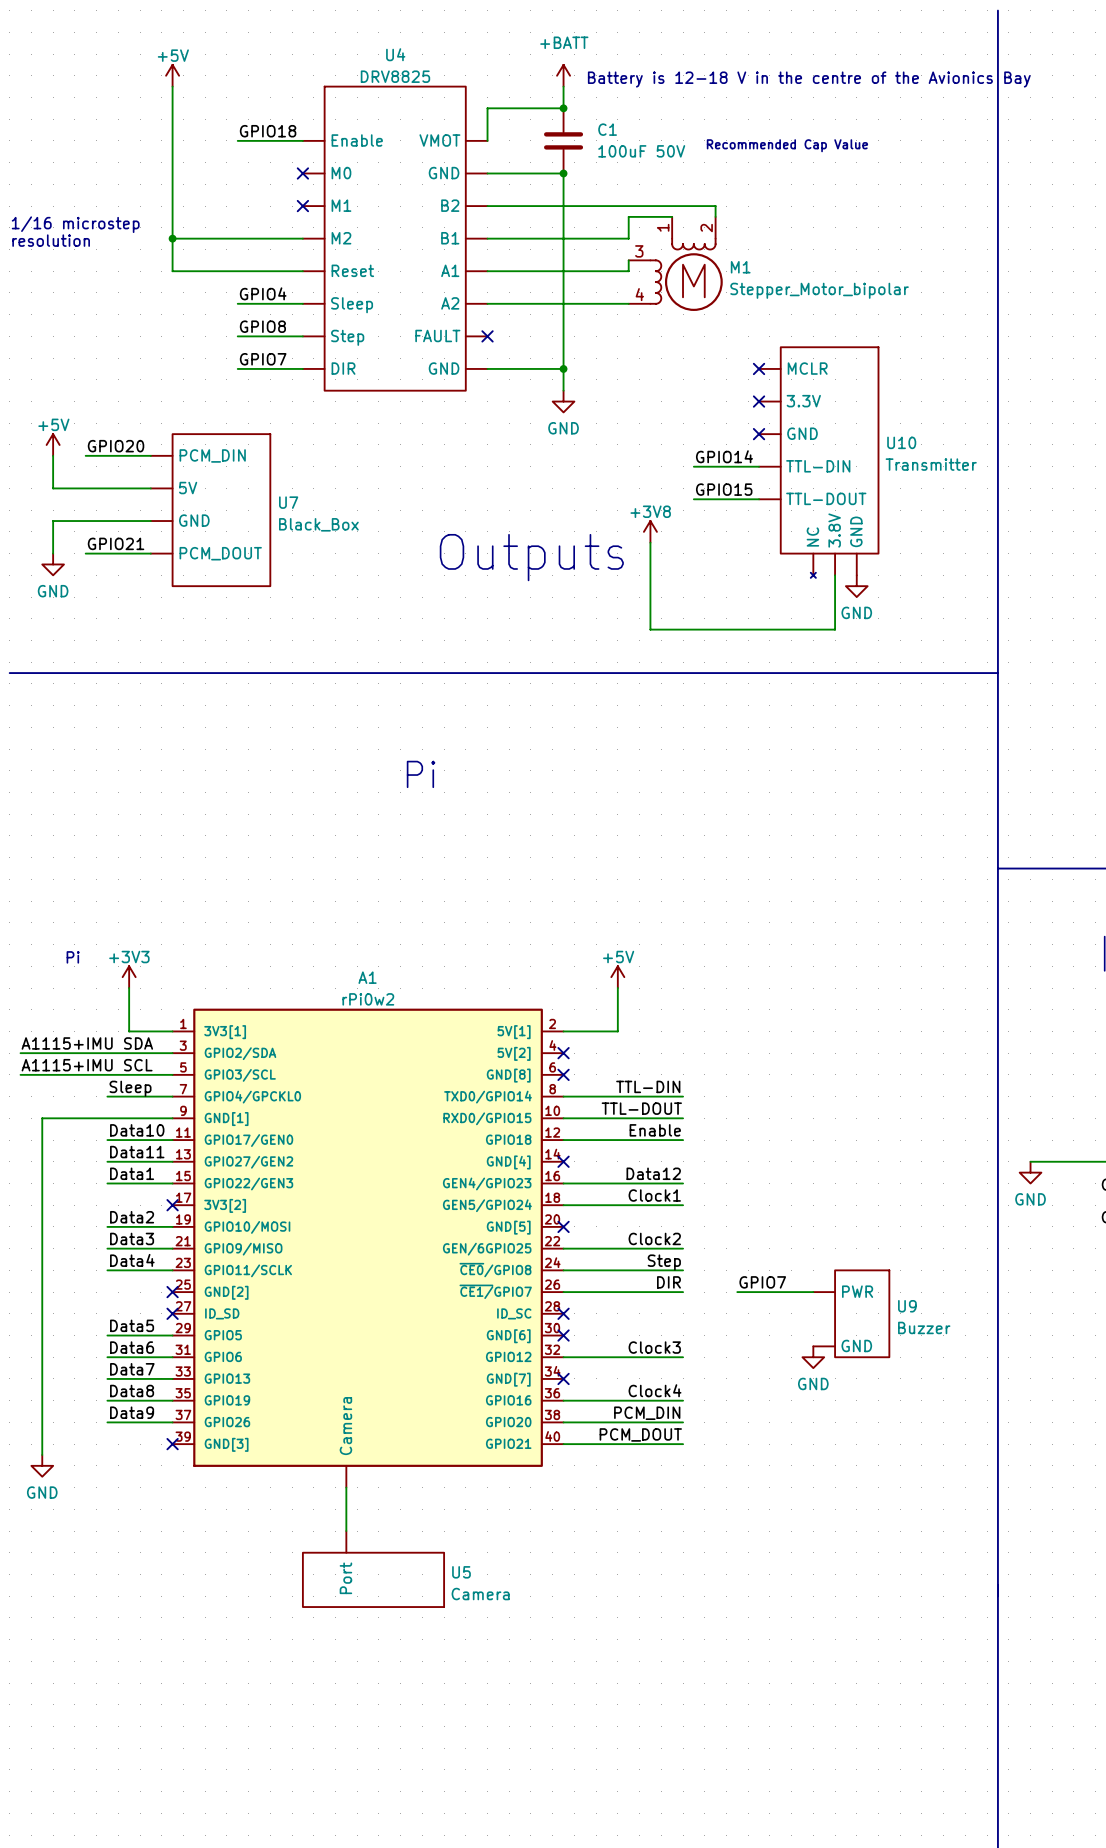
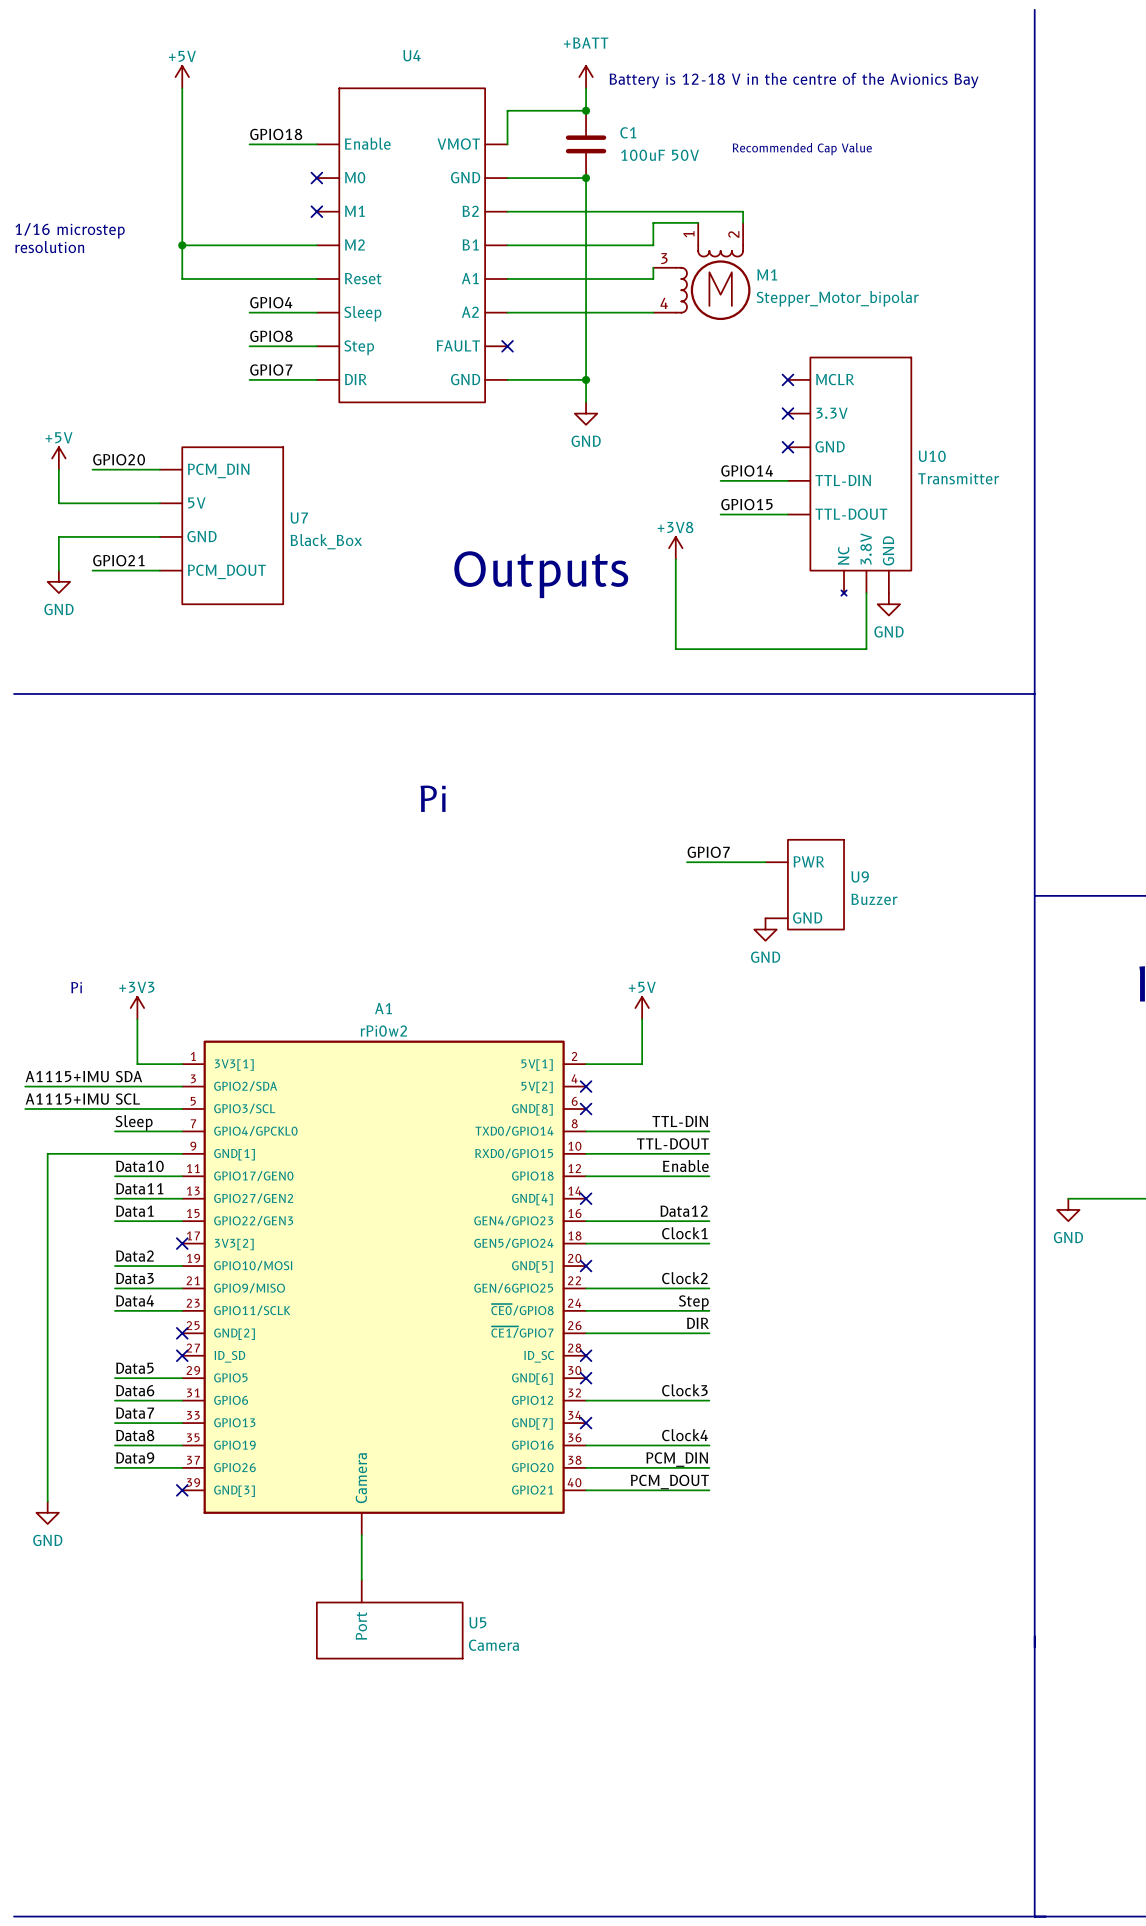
U4 value: DRV8825 (395, 76) -> none
label: none -> GPIO7 (708, 852)
wire: none -> (686, 862) (765, 862)
power symbol: none -> GND (765, 929)
label: GPIO7 (762, 1282) -> none
wire: (737, 1292) (813, 1292) -> none
U9 position: (851, 1313) -> (805, 884)
power symbol: GND (813, 1357) -> none

